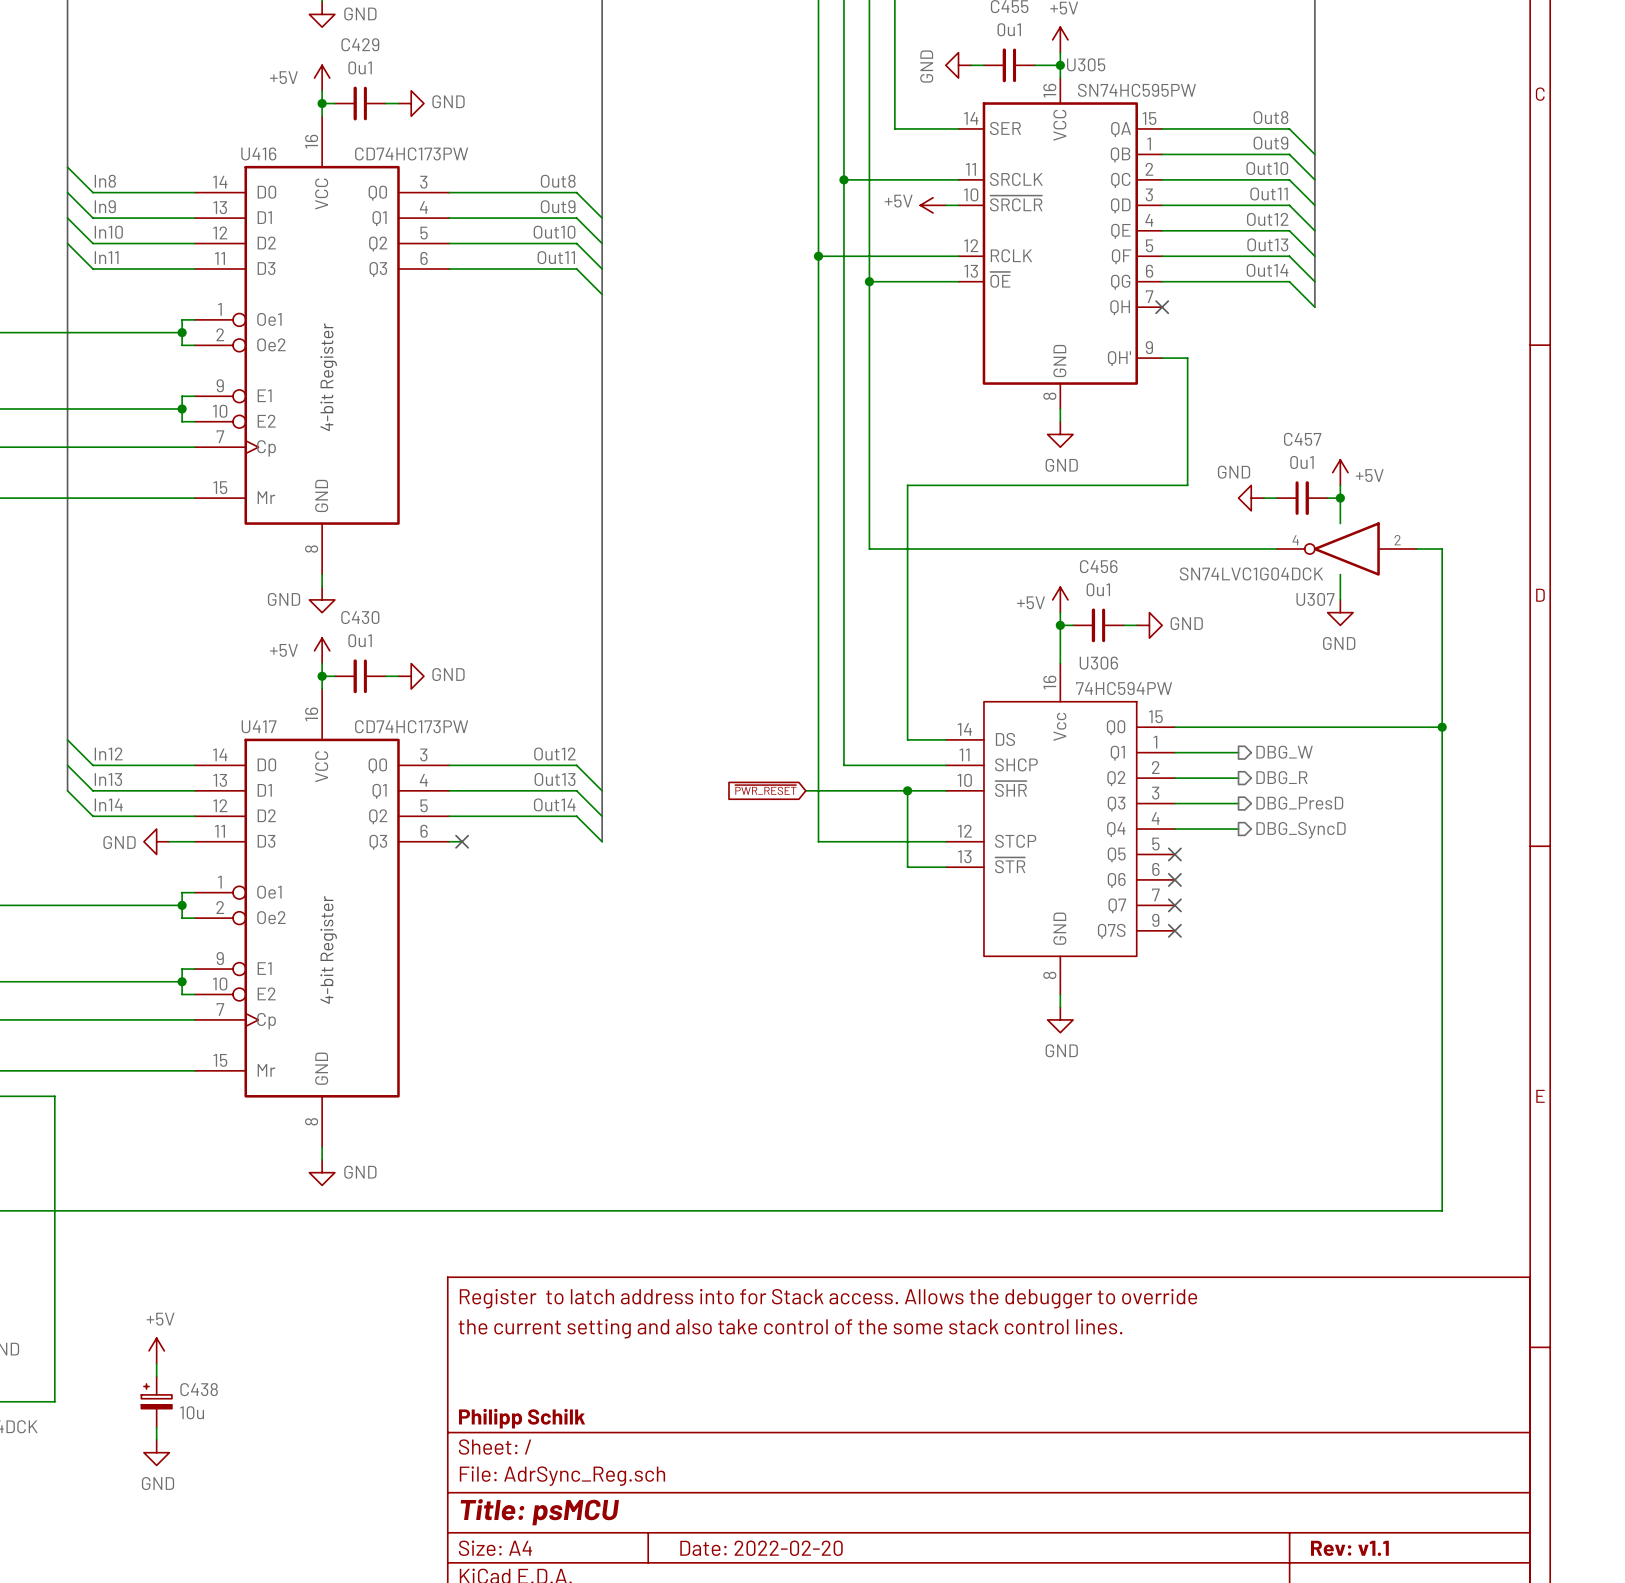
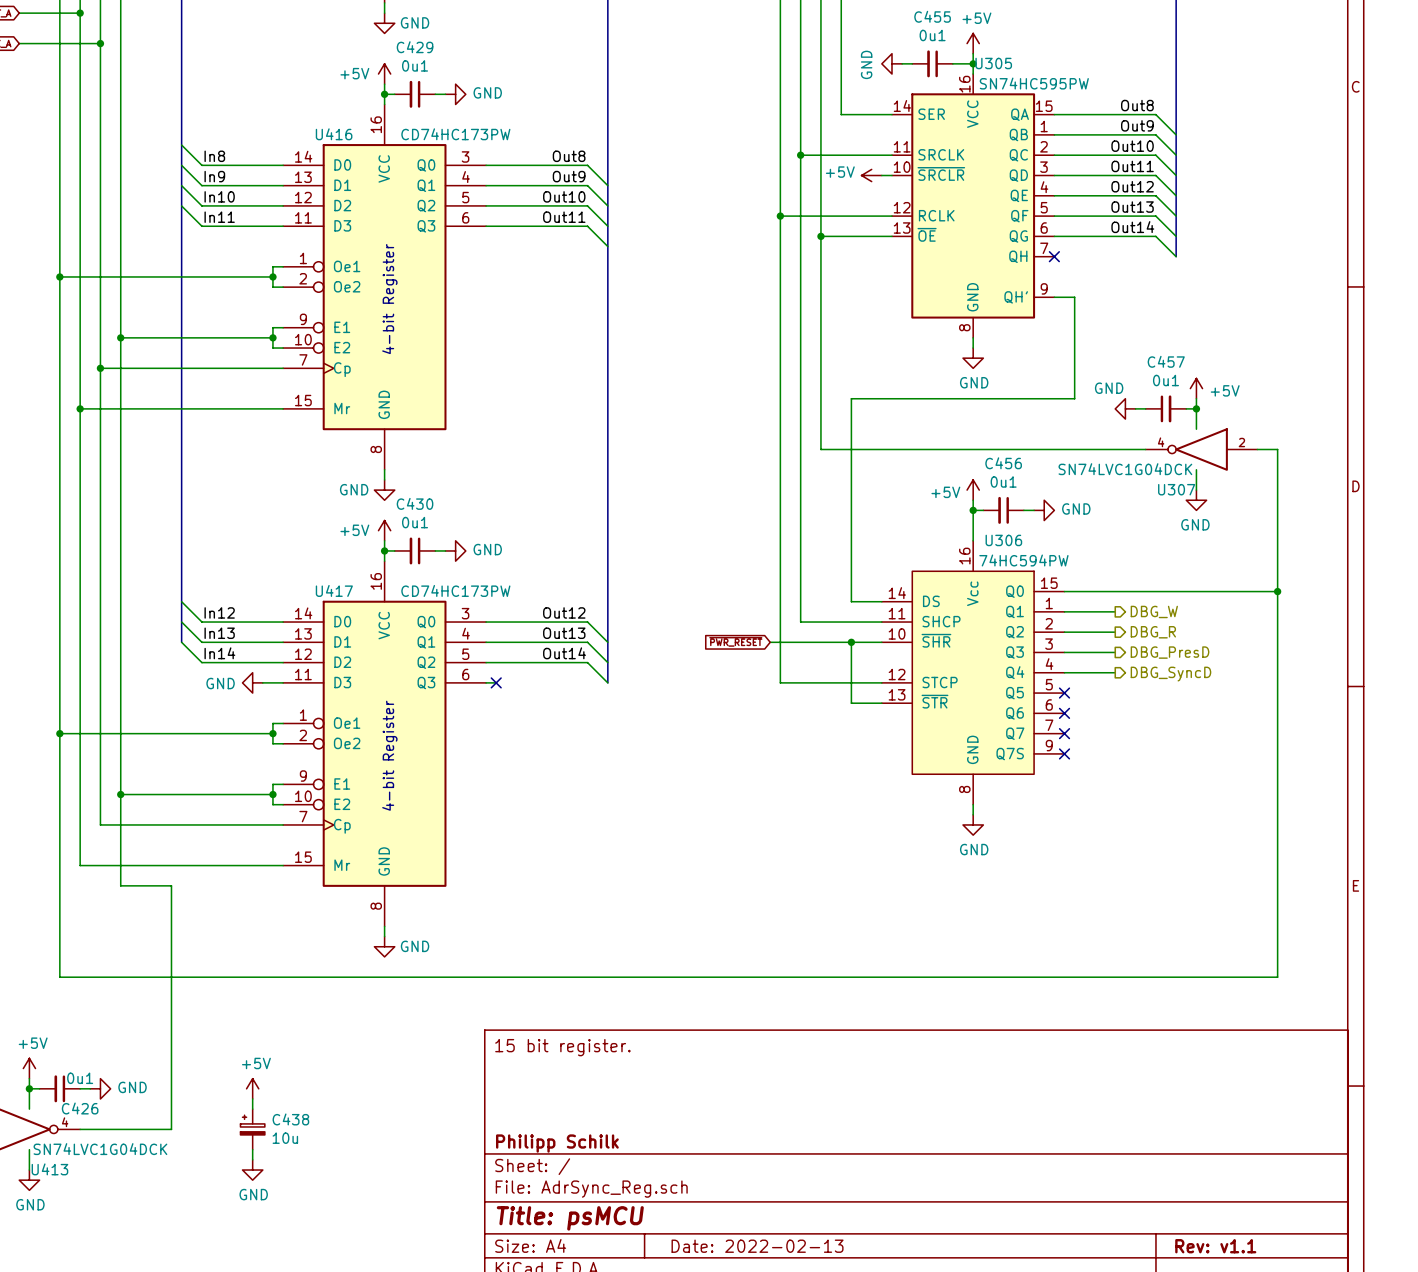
title block: Register to latch address into for Stack access. Allows the debugger to override (828, 1298) -> 15 bit register. (562, 1047)
title block: the current setting and also take control of the some stack control lines. (790, 1328) -> none
title block: Date: 2022-02-20 (761, 1548) -> Date: 2022-02-13 (757, 1246)

